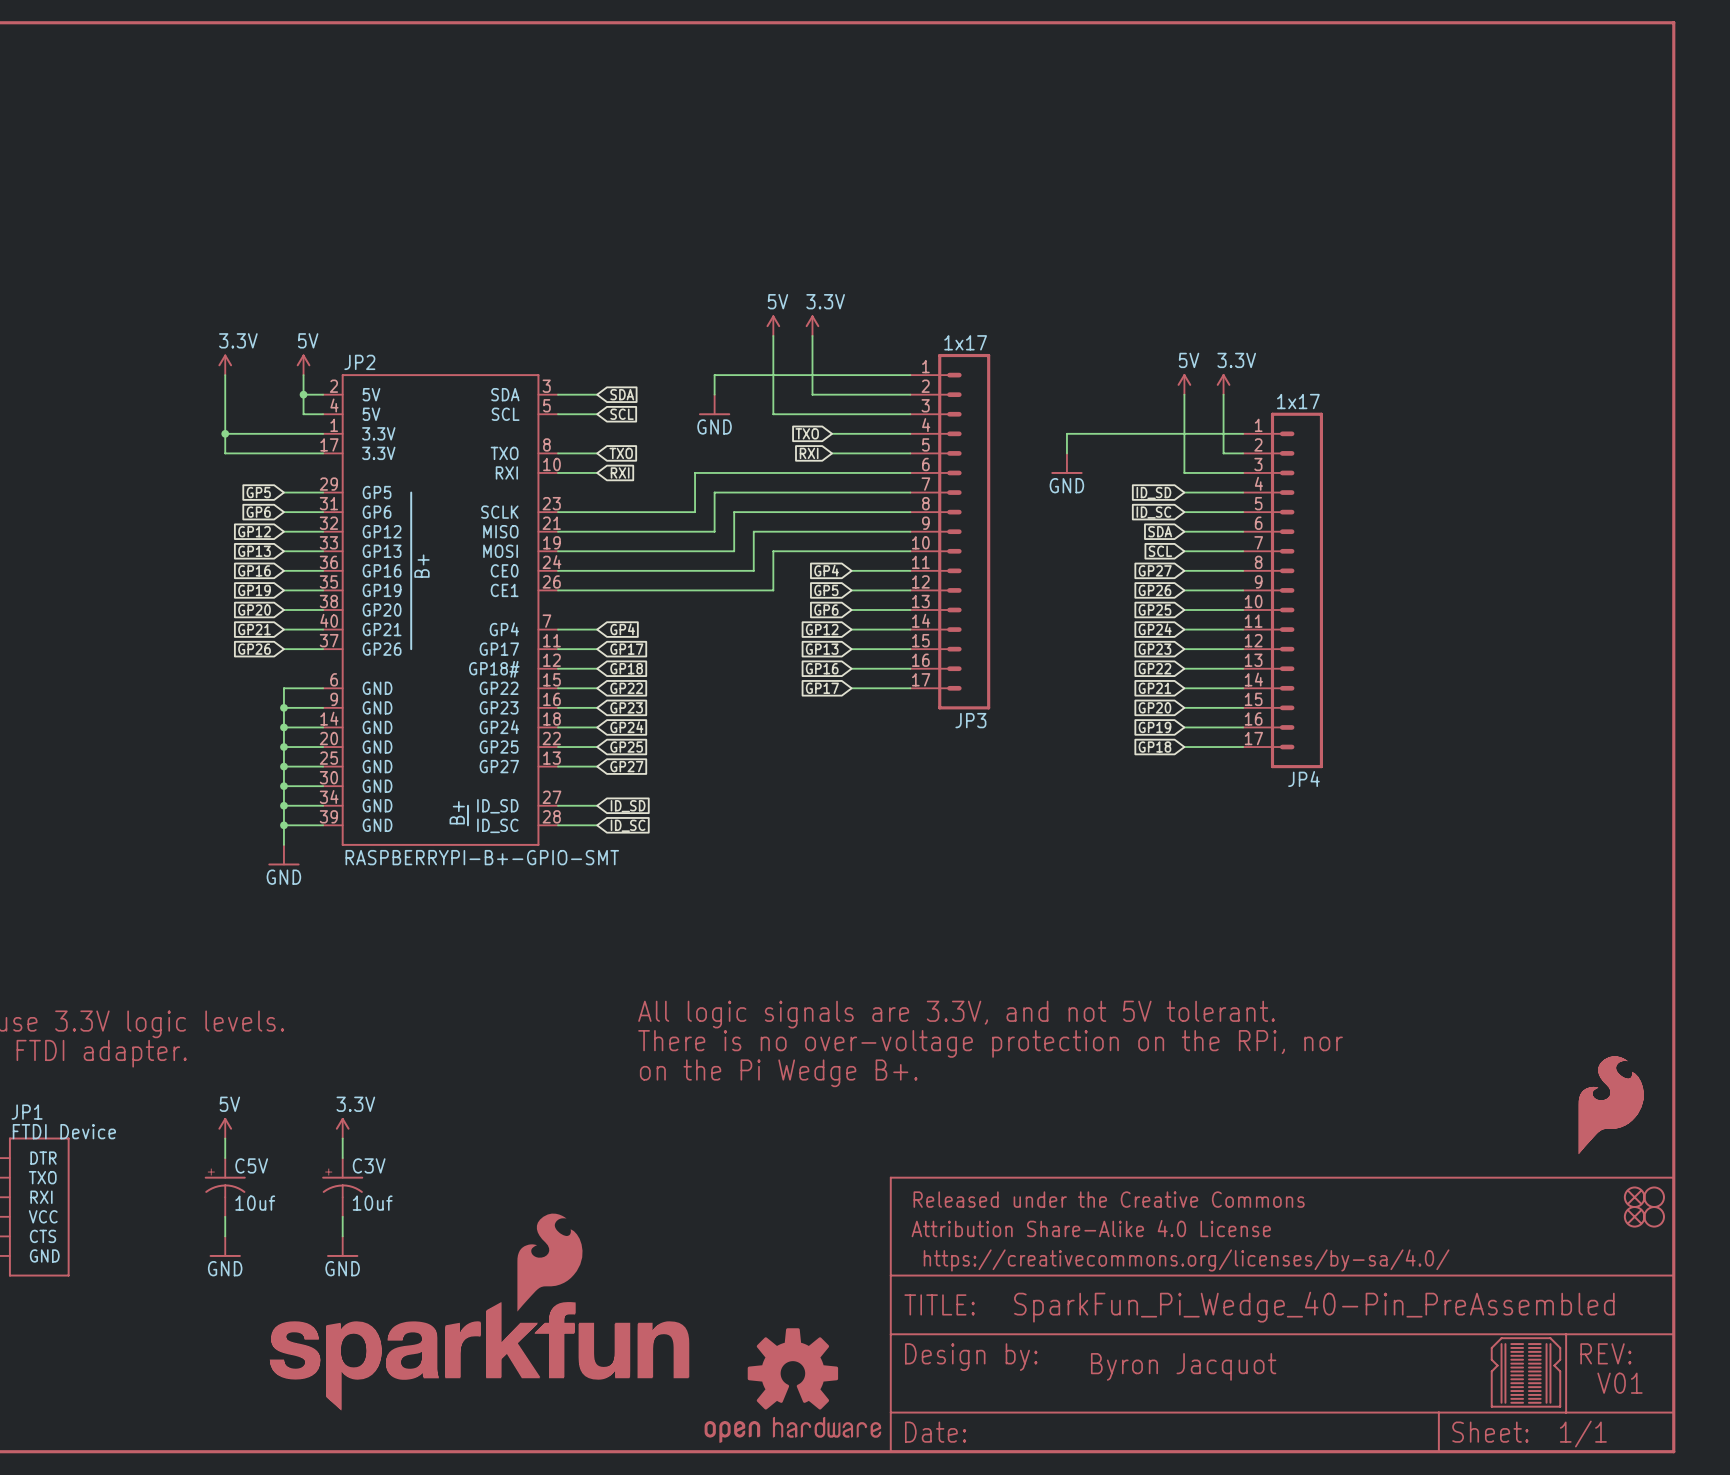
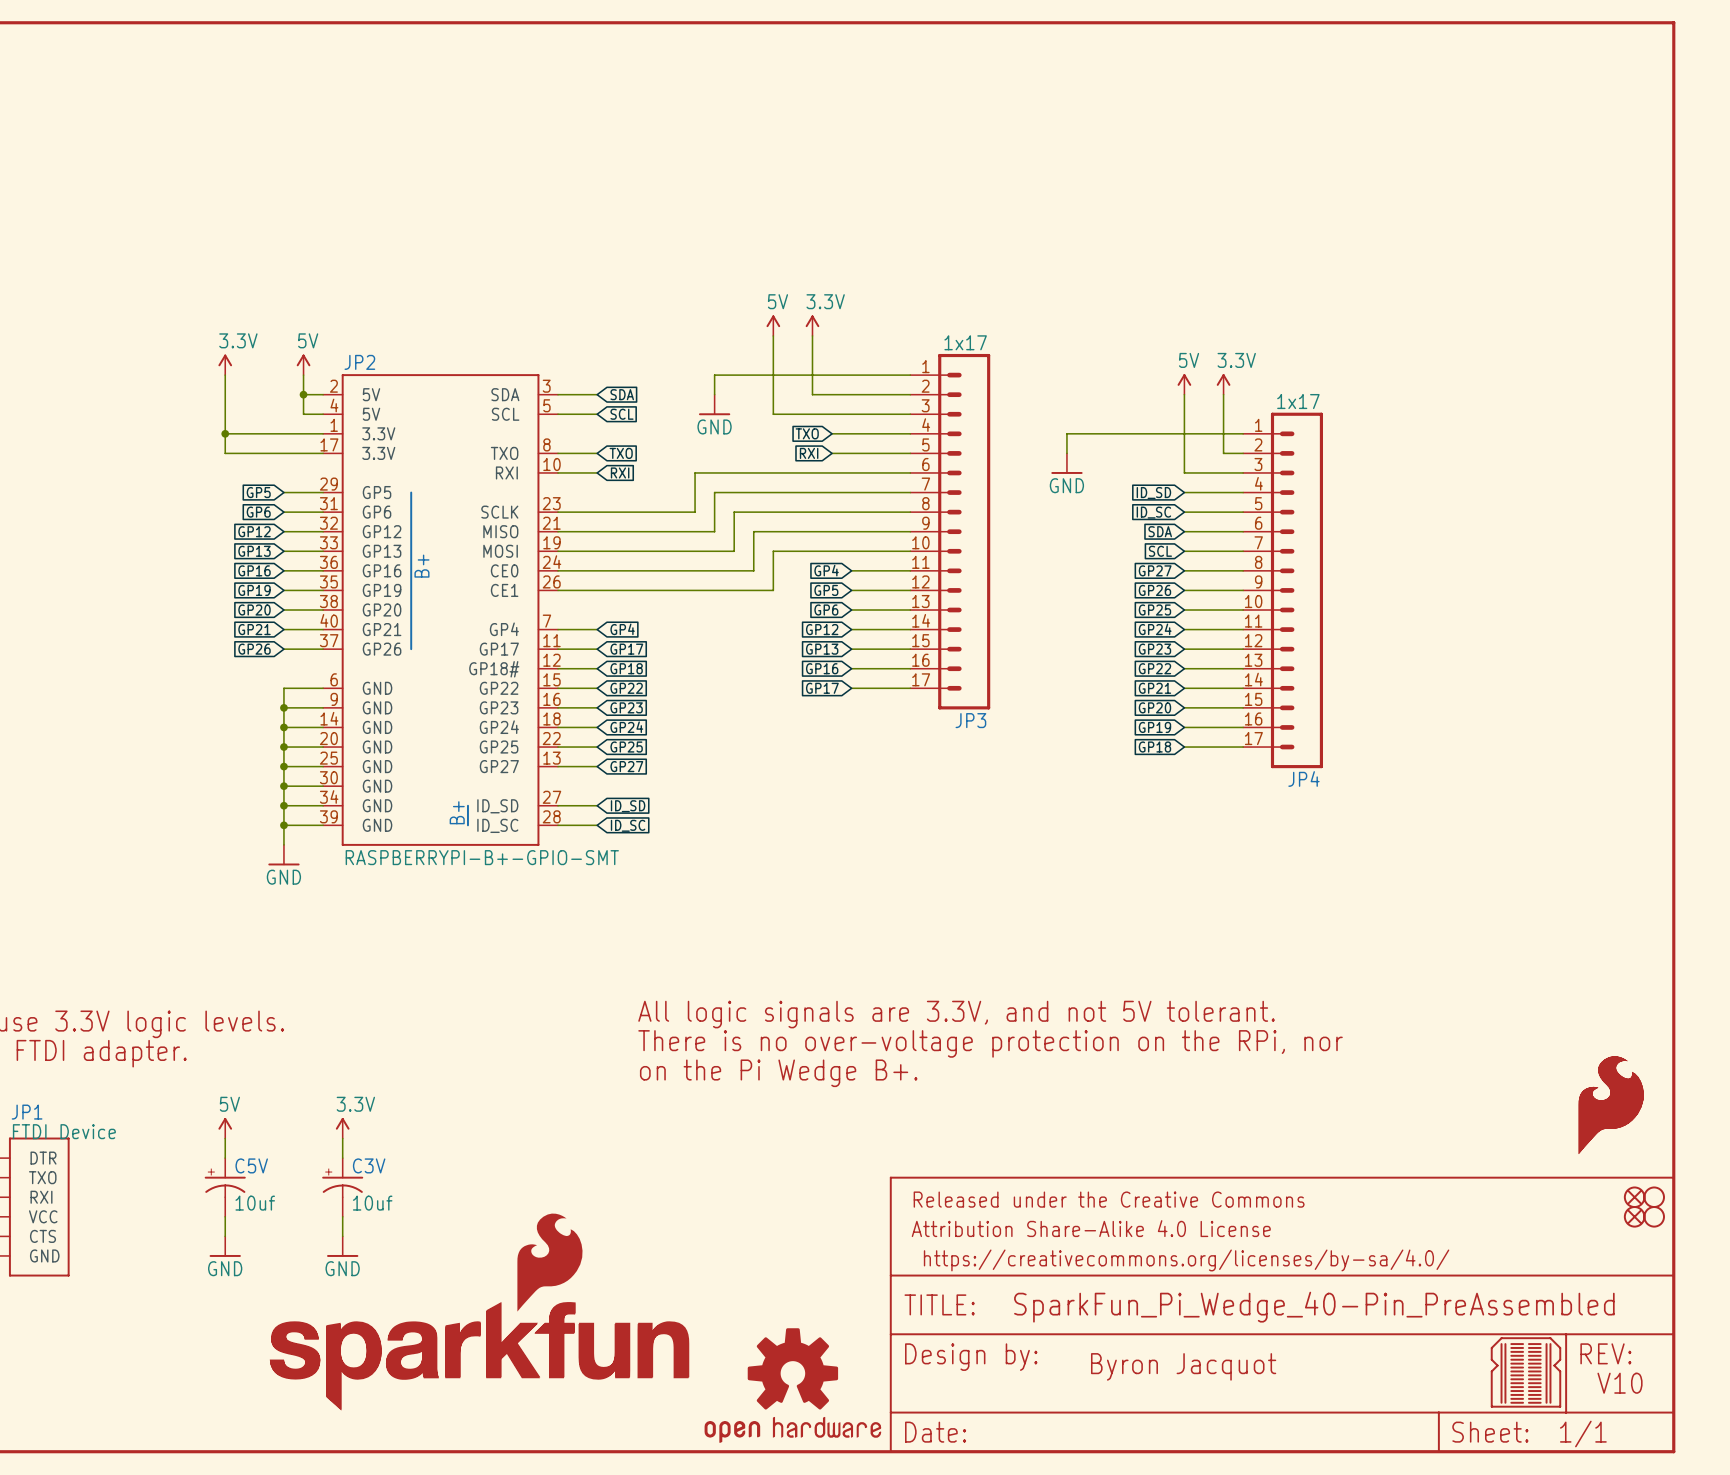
text: V01 (1620, 1383) -> V10 (1620, 1383)

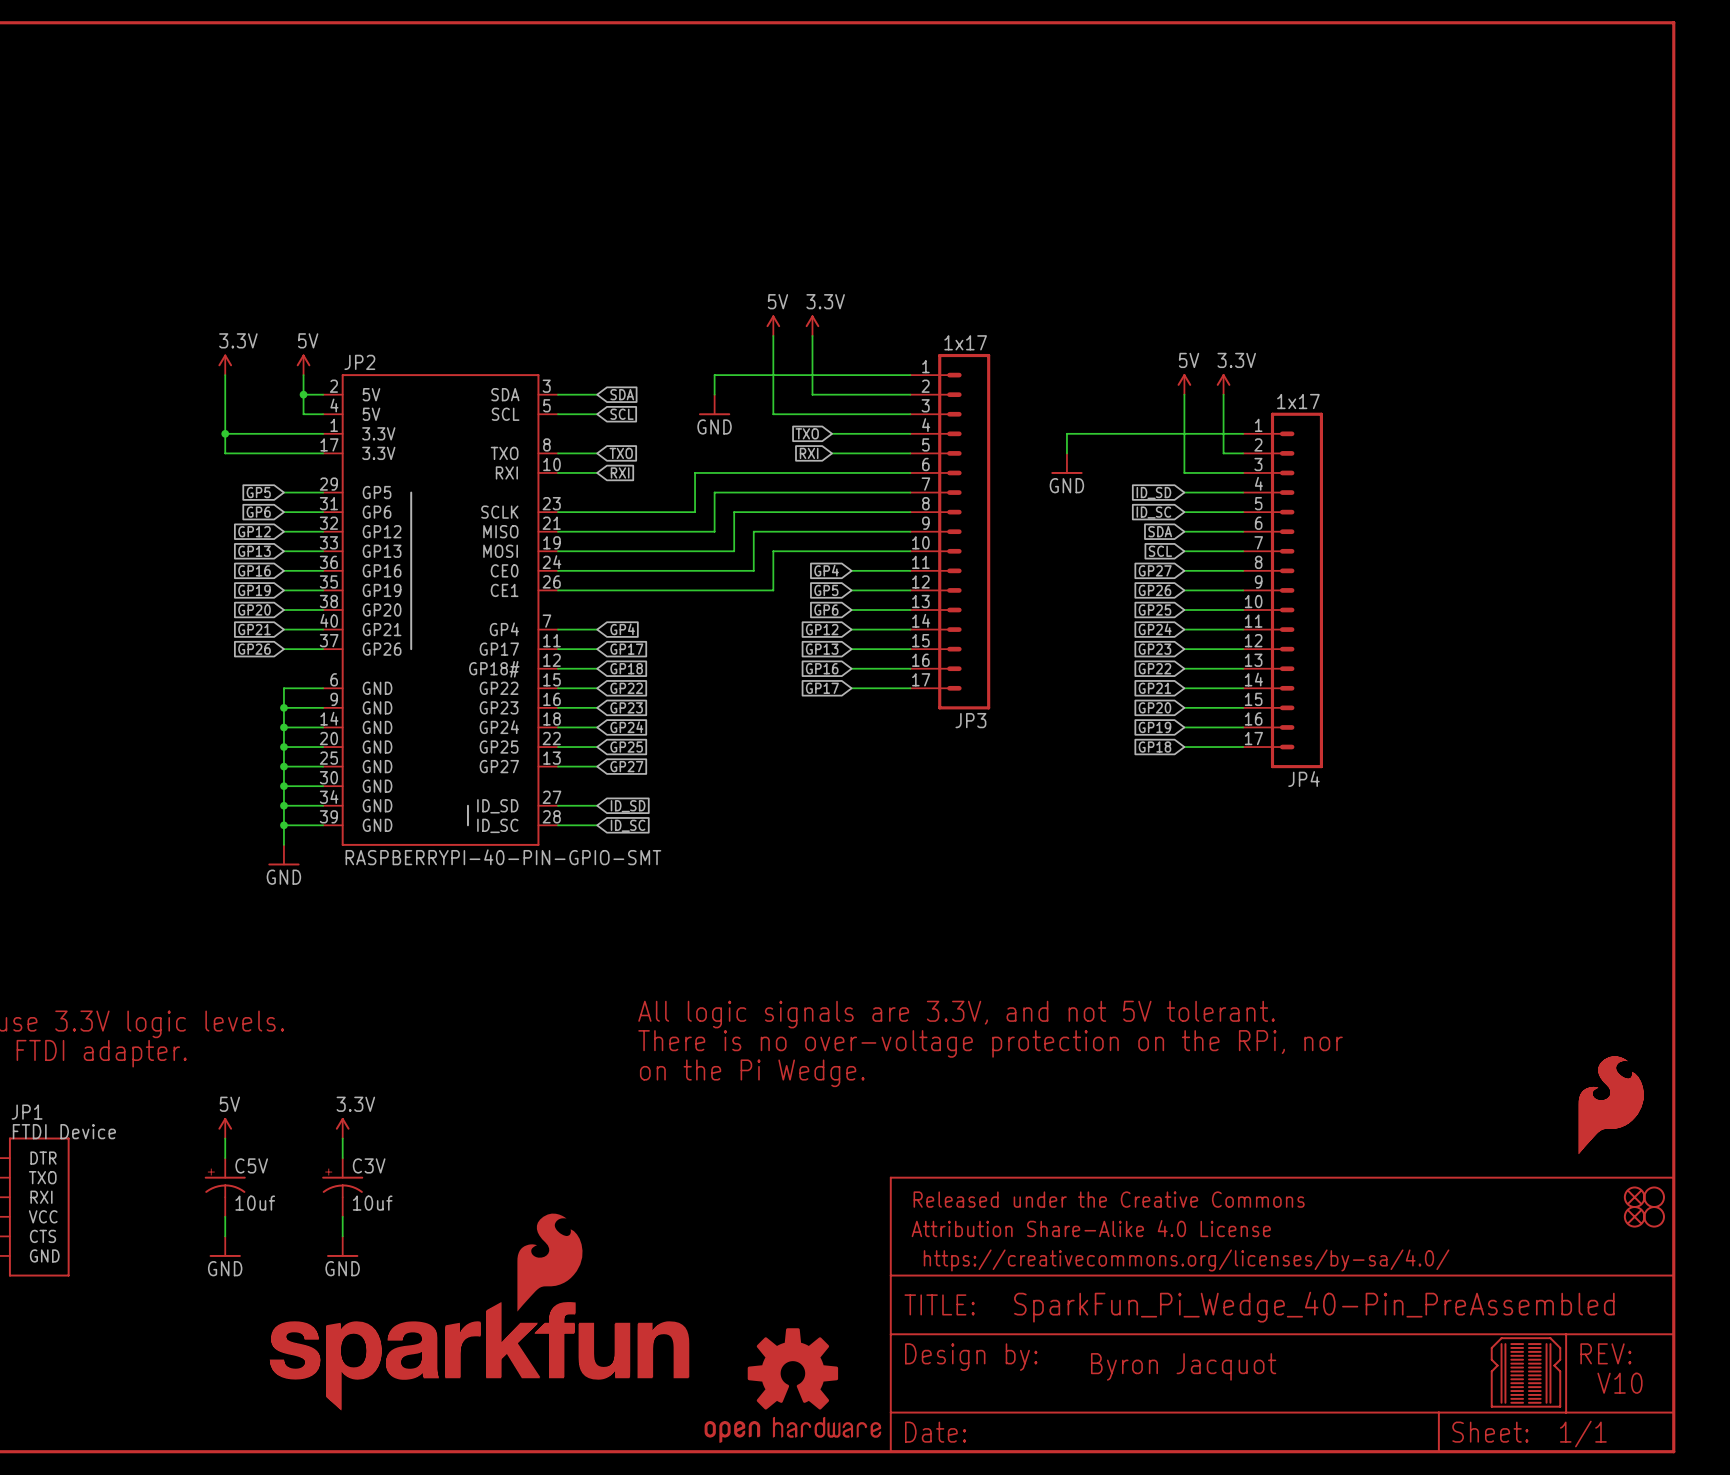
JP2 text: B+ (421, 566) -> none
JP2 text: B+ (457, 812) -> none
JP2 value: RASPBERRYPI-B+-GPIO-SMT (482, 857) -> RASPBERRYPI-40-PIN-GPIO-SMT (503, 857)
text: on the Pi Wedge B+. (778, 1073) -> on the Pi Wedge. (752, 1073)

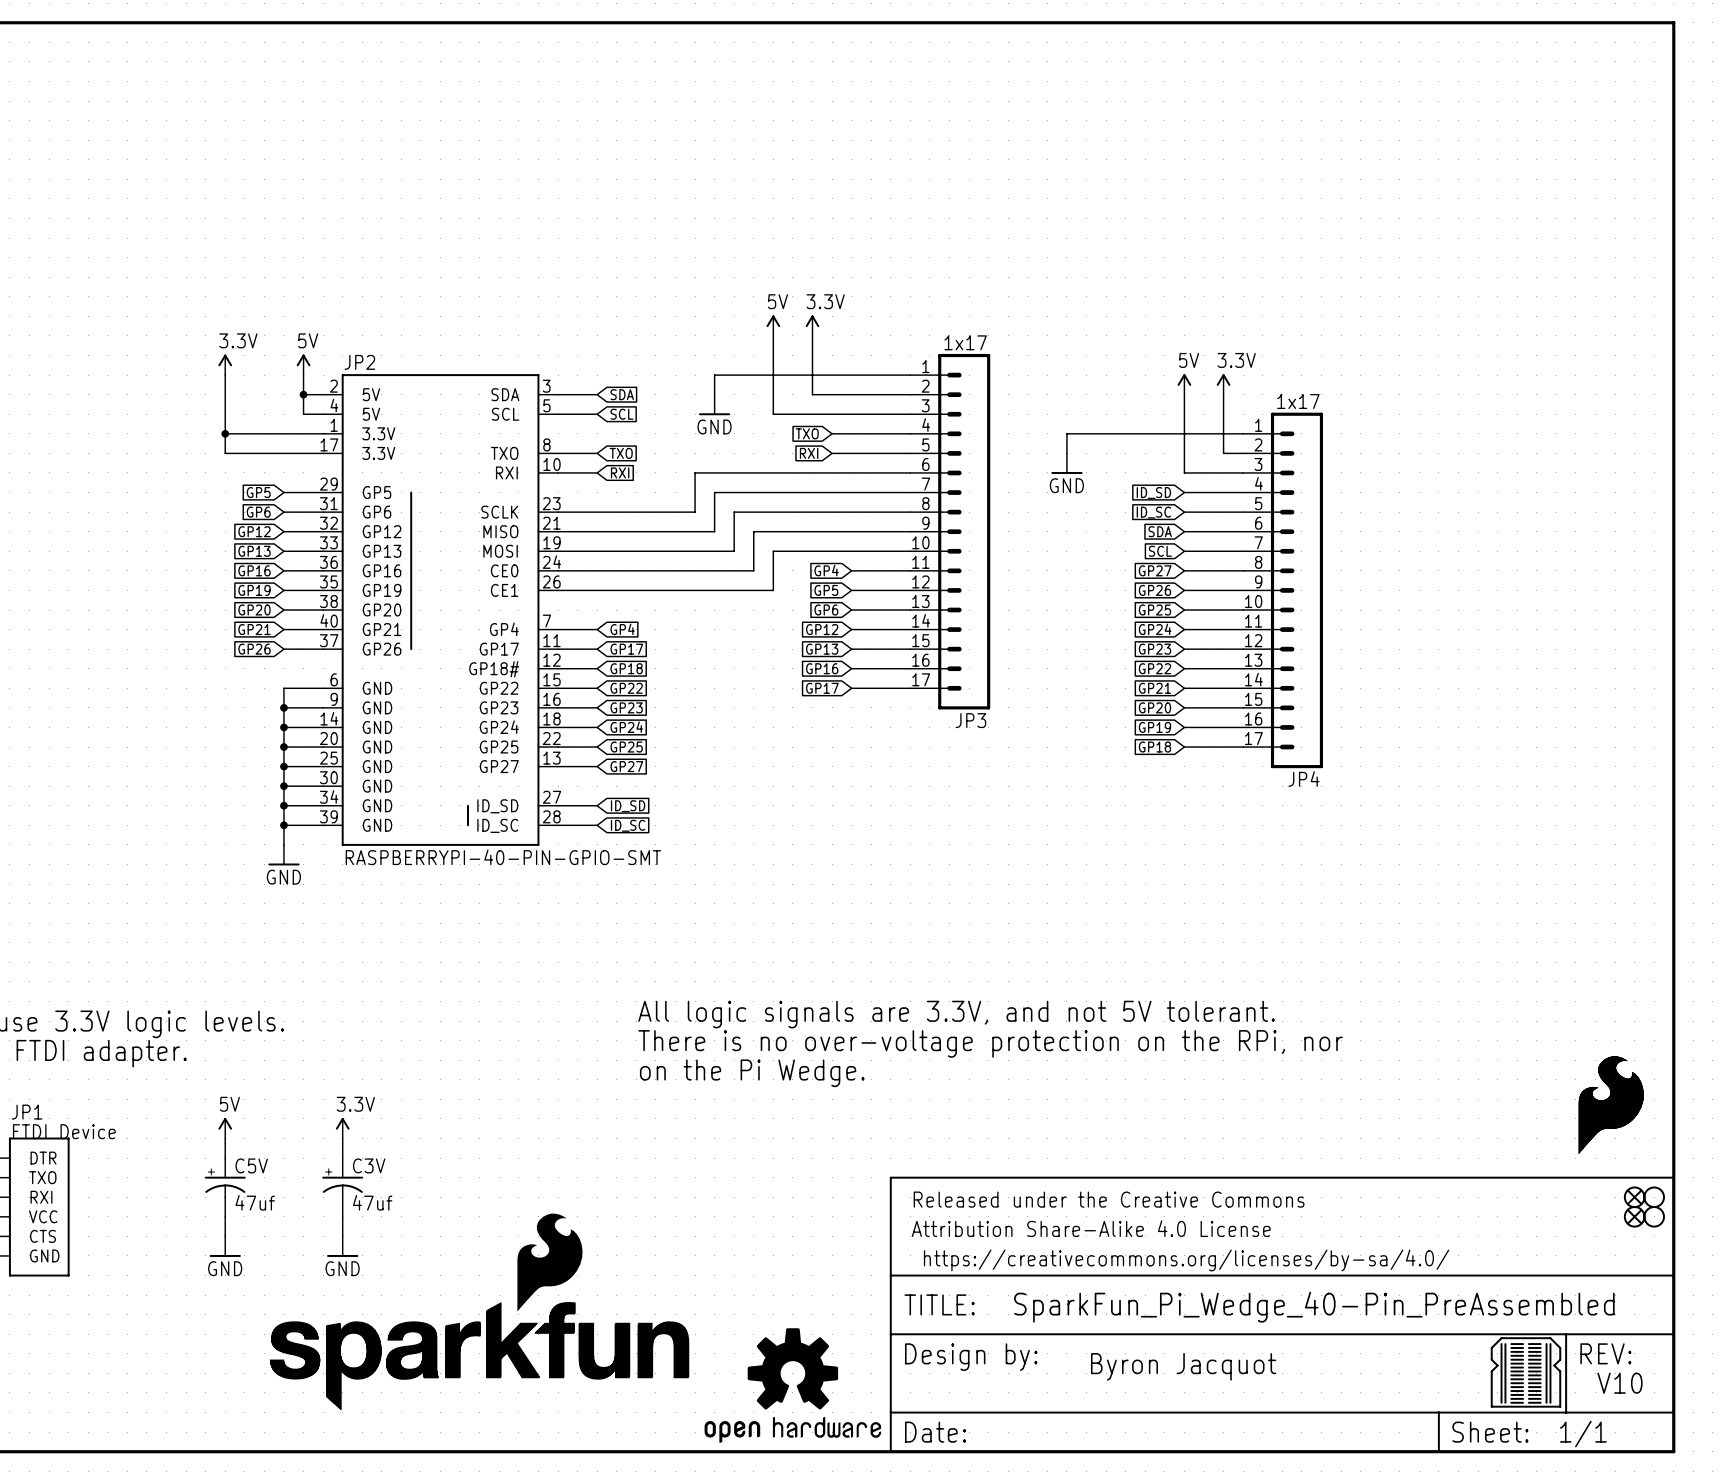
C5V value: 10uf (255, 1203) -> 47uf (255, 1202)
C3V value: 10uf (372, 1203) -> 47uf (372, 1202)

